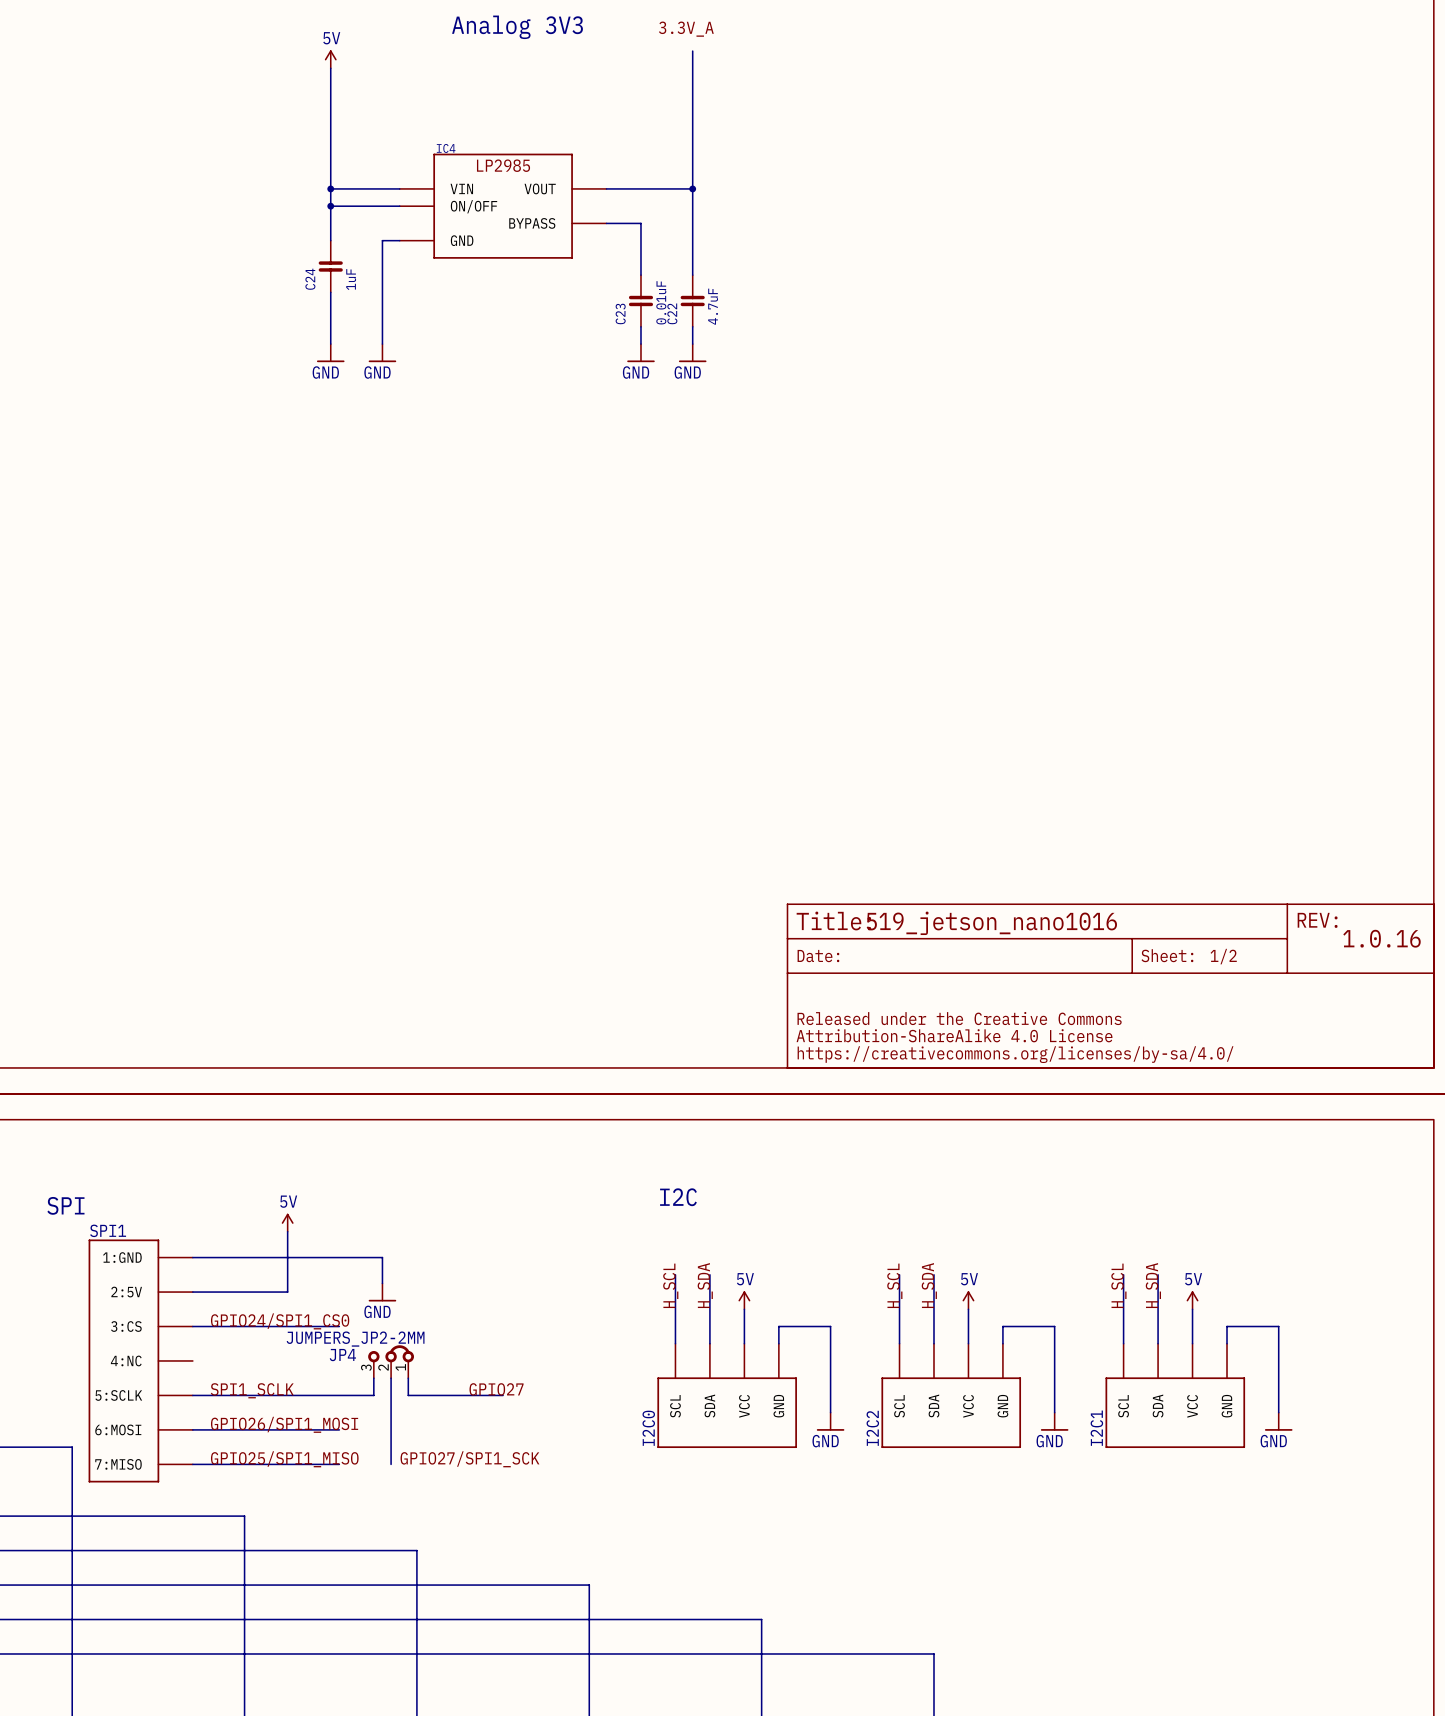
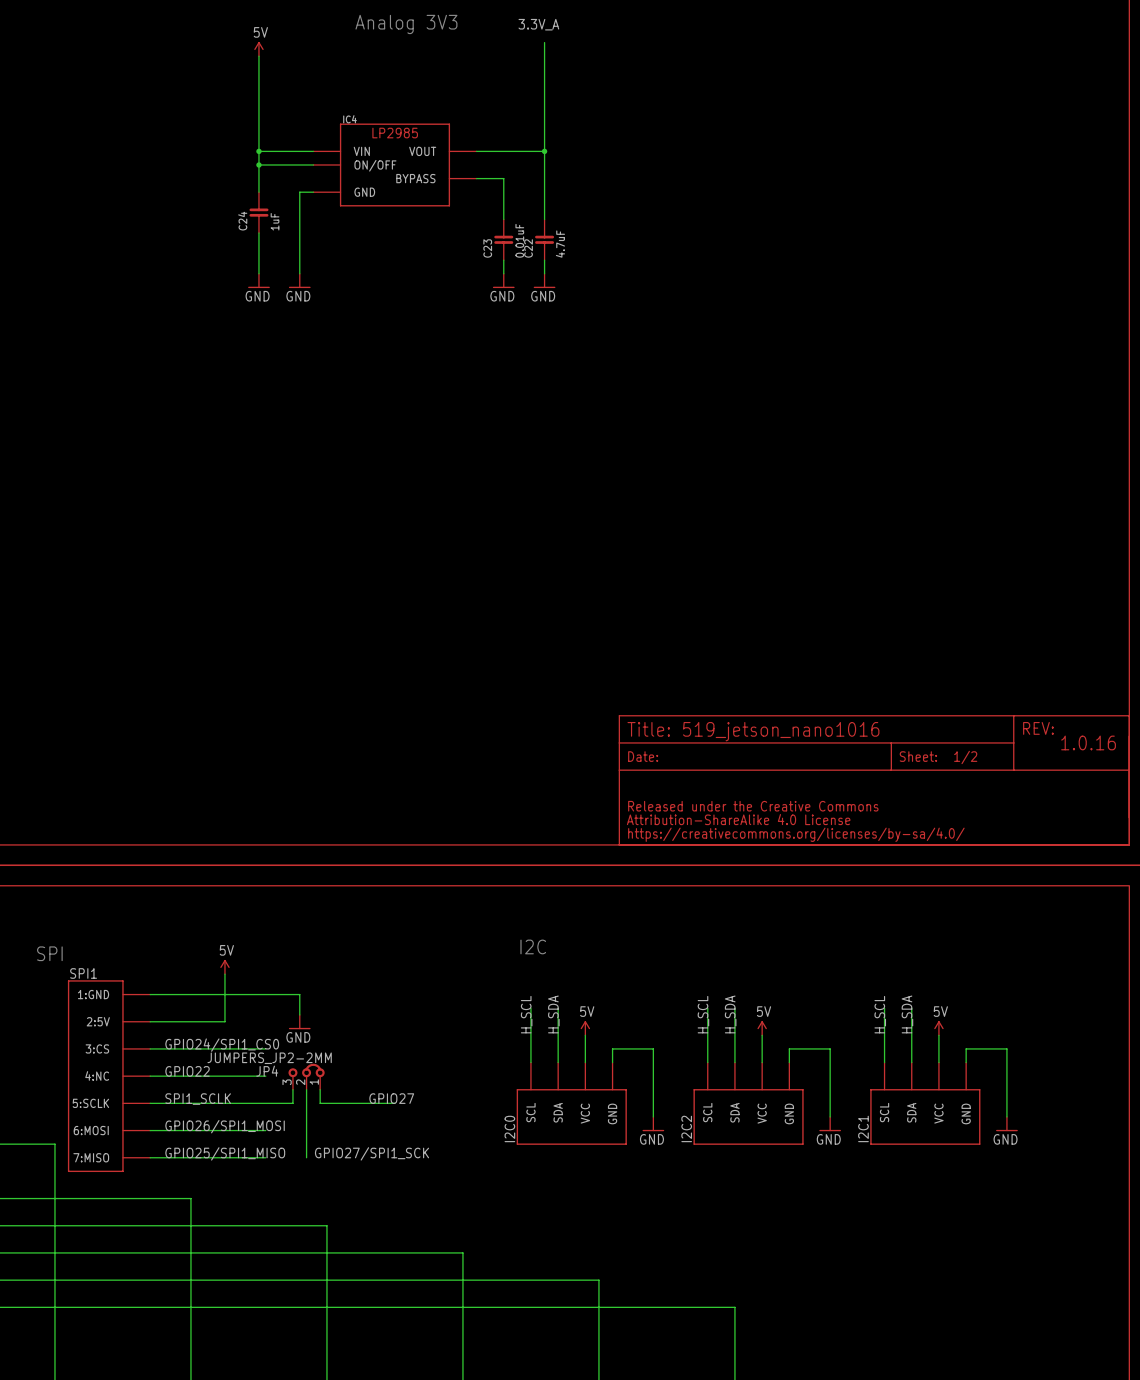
label: none -> GPIO22 (187, 1071)
wire: none -> (150, 1076) (265, 1076)

